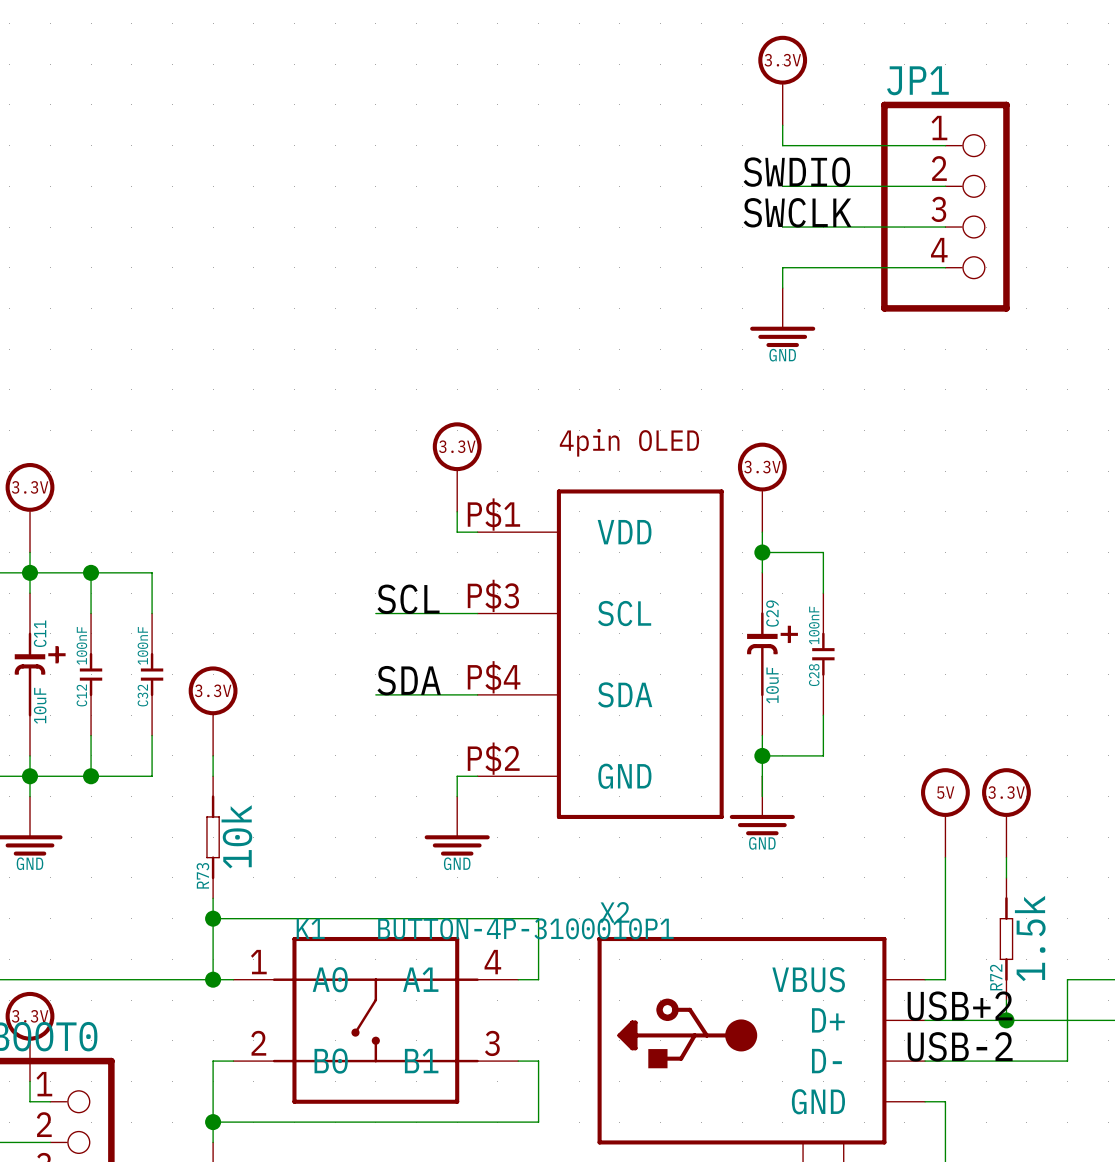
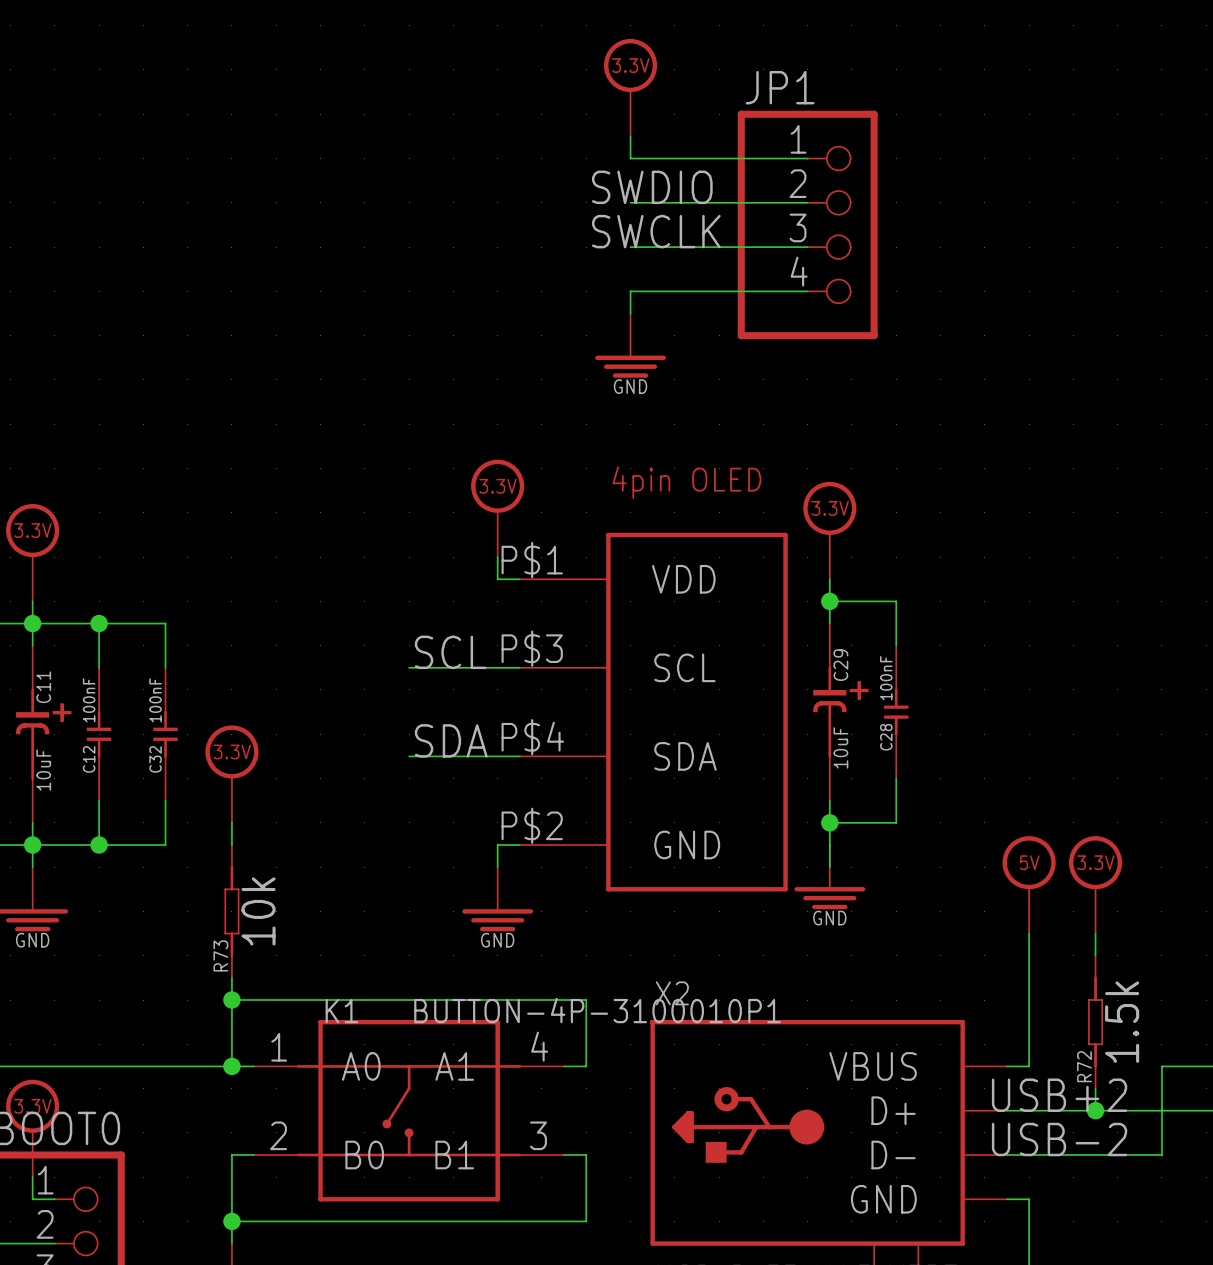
power symbol position: (782, 80) -> (630, 87)
wire: (782, 125) (782, 145) (945, 145) -> (630, 136) (630, 158) (807, 158)
label position: SWDIO (796, 172) -> SWDIO (652, 187)
wire: (782, 186) (945, 186) -> (630, 202) (807, 202)
JP1 position: (945, 206) -> (807, 224)
label position: SWCLK (797, 212) -> SWCLK (656, 231)
wire: (782, 227) (945, 227) -> (630, 247) (807, 247)
wire: (945, 267) (782, 267) (782, 288) -> (807, 291) (630, 291) (630, 313)
power symbol position: GND (782, 317) -> GND (630, 345)

